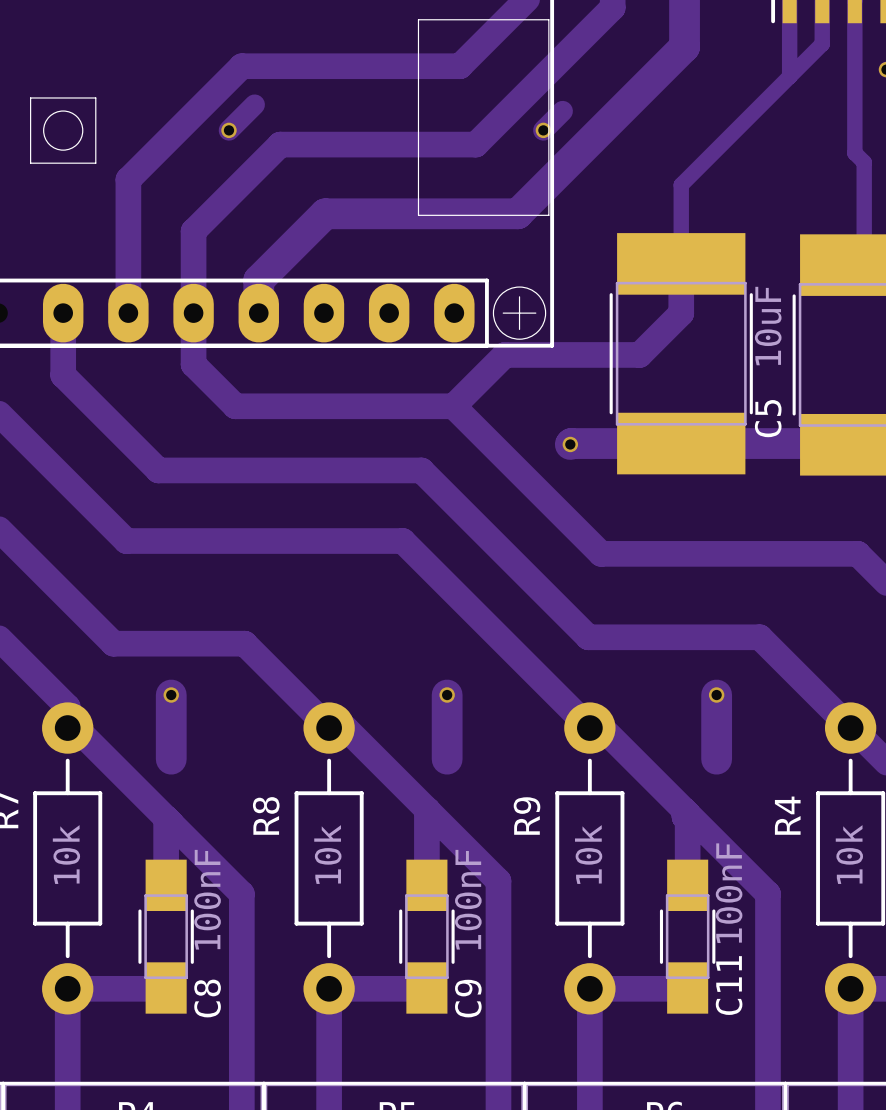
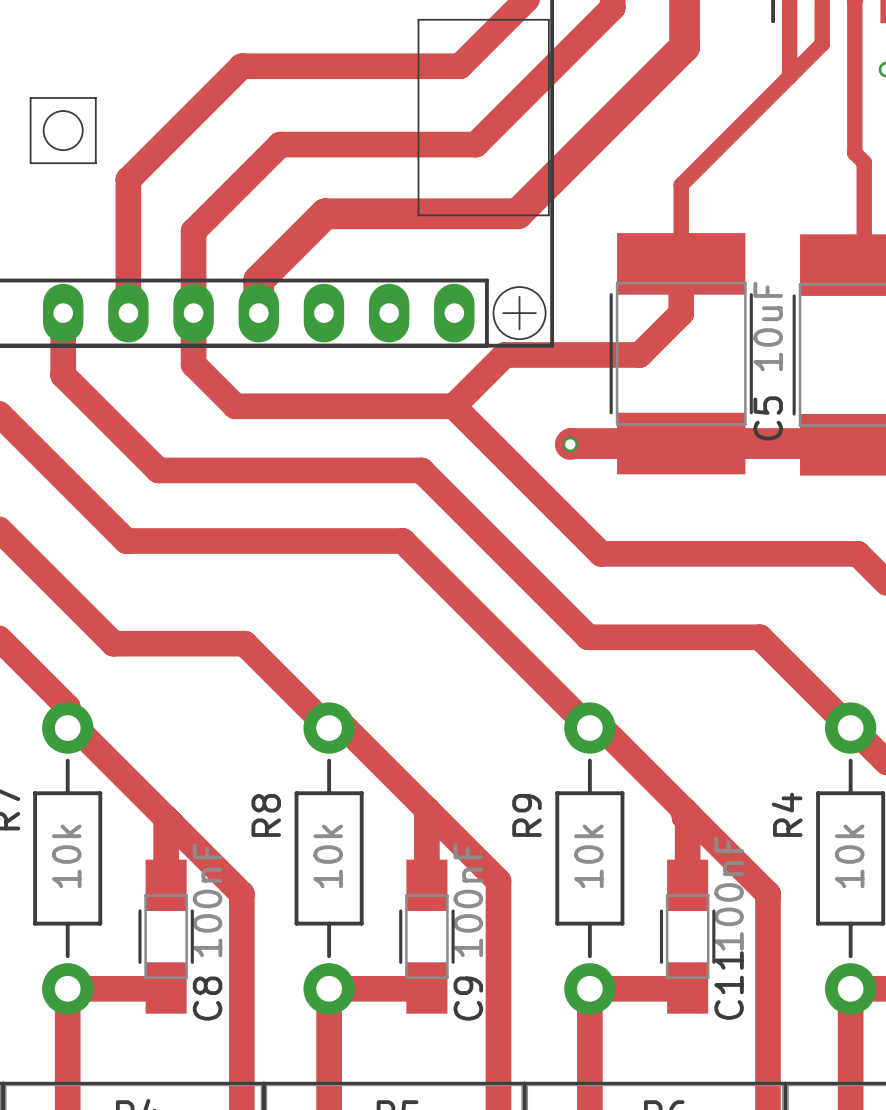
track: (254, 104) (228, 130) -> none
track: (562, 111) (543, 130) -> none
via: (228, 130) -> none
via: (543, 130) -> none
track: (171, 695) (171, 759) -> none
via: (171, 695) -> none
track: (447, 695) (447, 759) -> none
via: (447, 695) -> none
track: (716, 695) (716, 759) -> none
via: (716, 695) -> none

